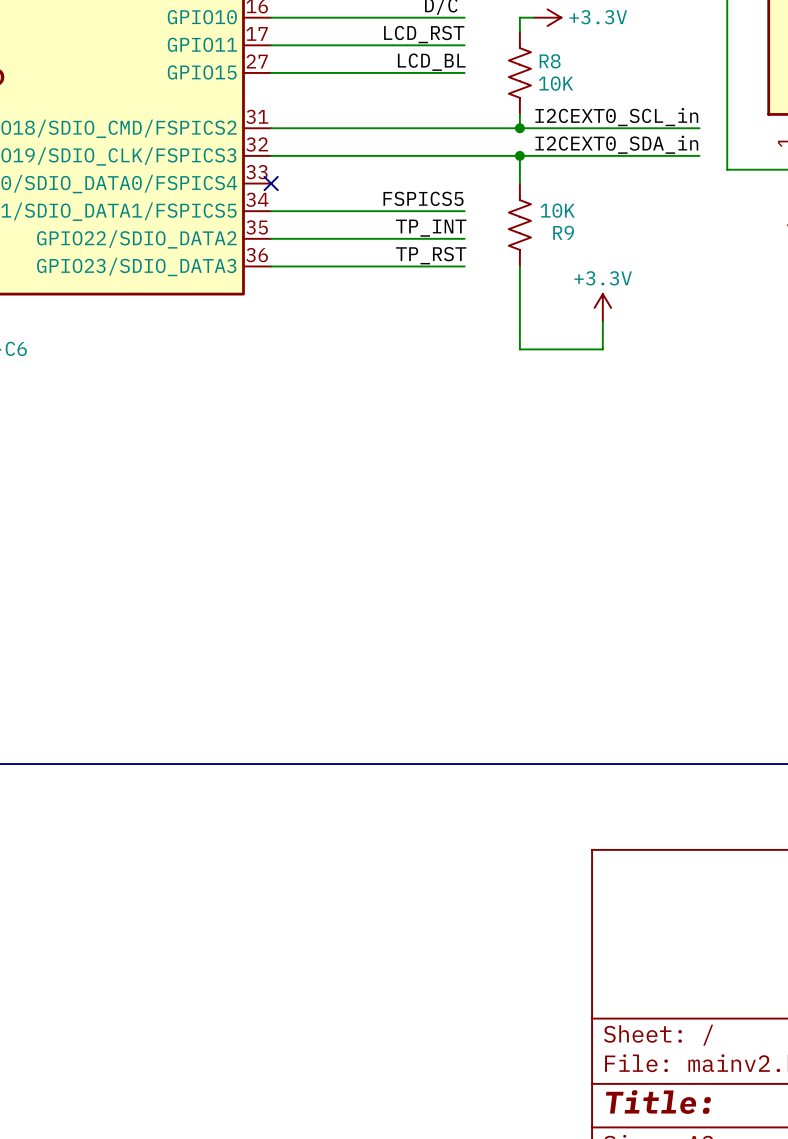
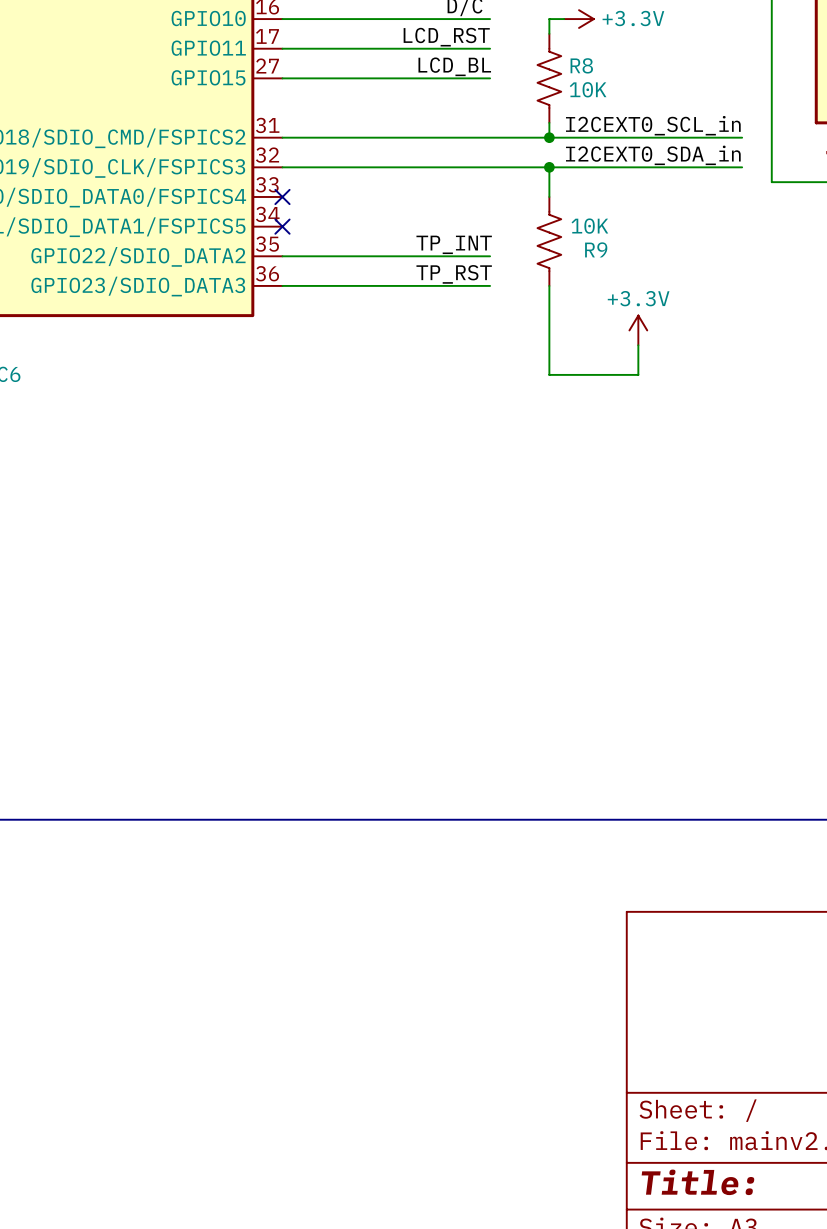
label: FSPICS5 (423, 198) -> none
wire: (271, 211) (464, 211) -> none
no-connect mark: none -> (282, 226)

